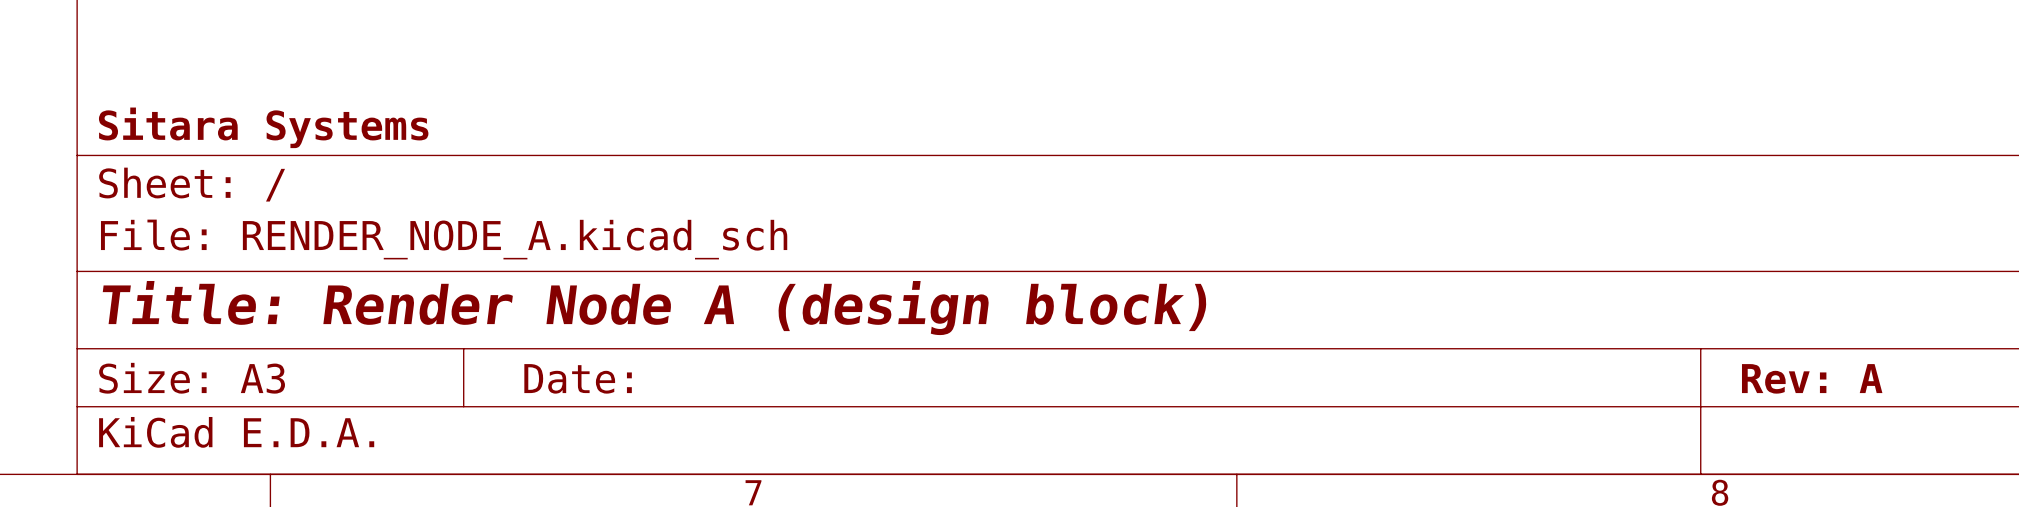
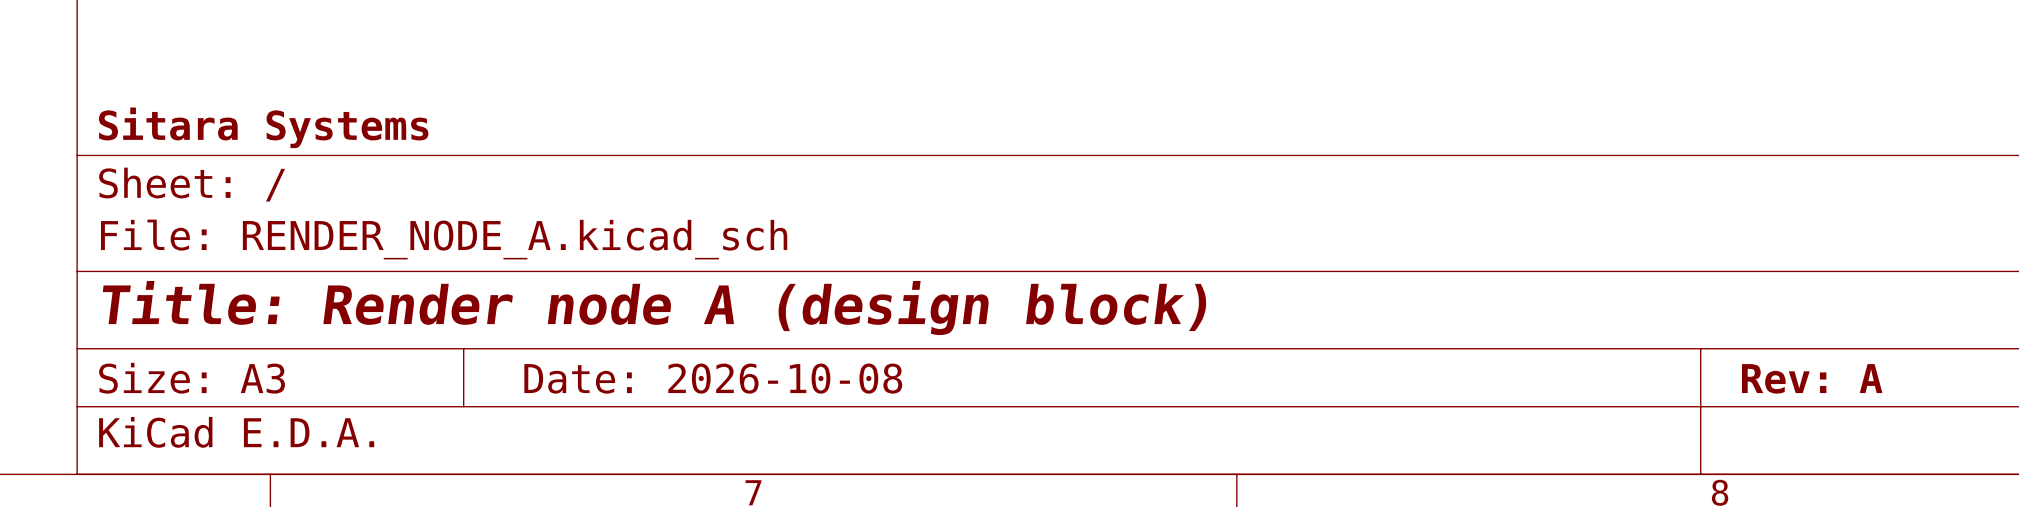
title block: Title: Render Node A (design block) (654, 308) -> Title: Render node A (design block) (654, 308)
title block: Date: (578, 378) -> Date: 2026-10-08 (713, 378)

